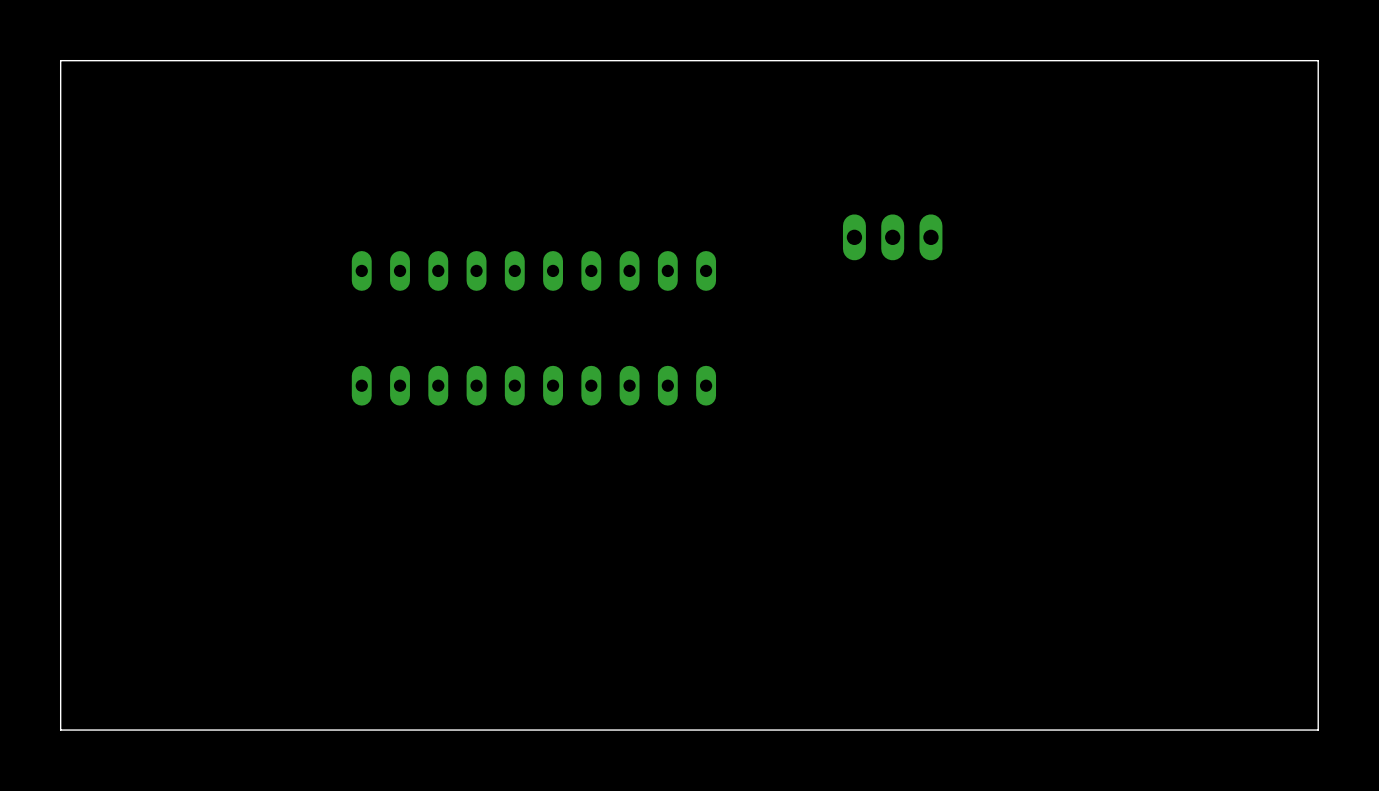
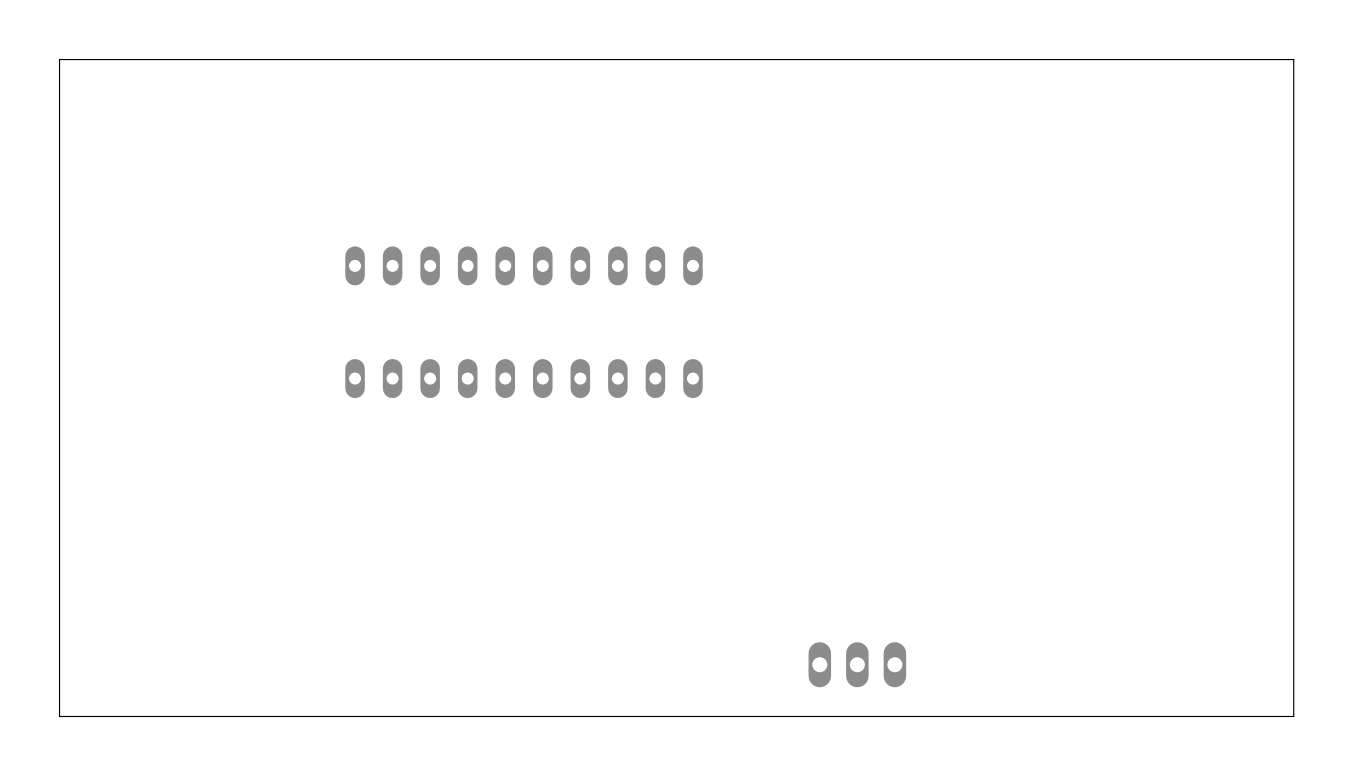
part: (892, 237) -> none
part: none -> (857, 664)

